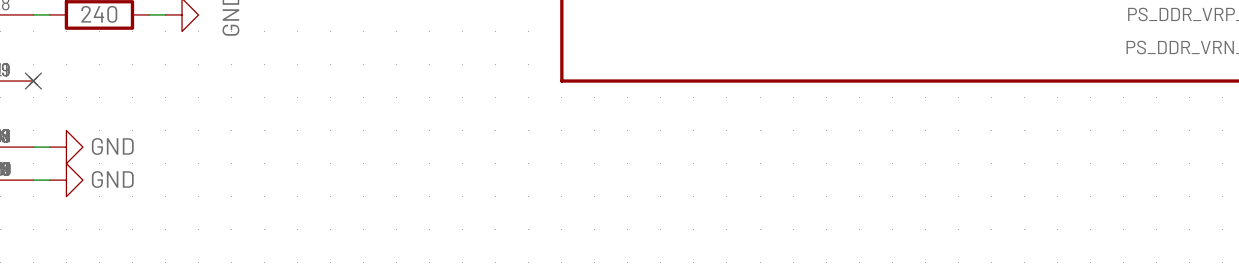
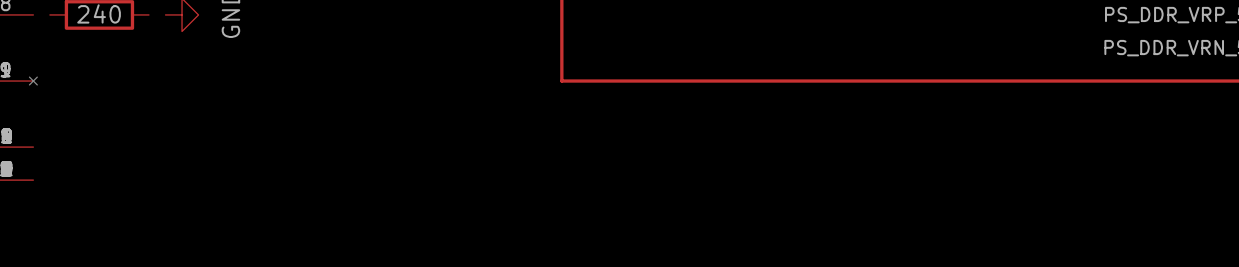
wire: (33, 14) (49, 14) -> none
wire: (148, 14) (165, 14) -> none
no-connect mark: (33, 81) -> none
wire: (33, 147) (49, 147) -> none
power symbol: GND (66, 147) -> none
wire: (33, 180) (49, 180) -> none
power symbol: GND (66, 180) -> none

